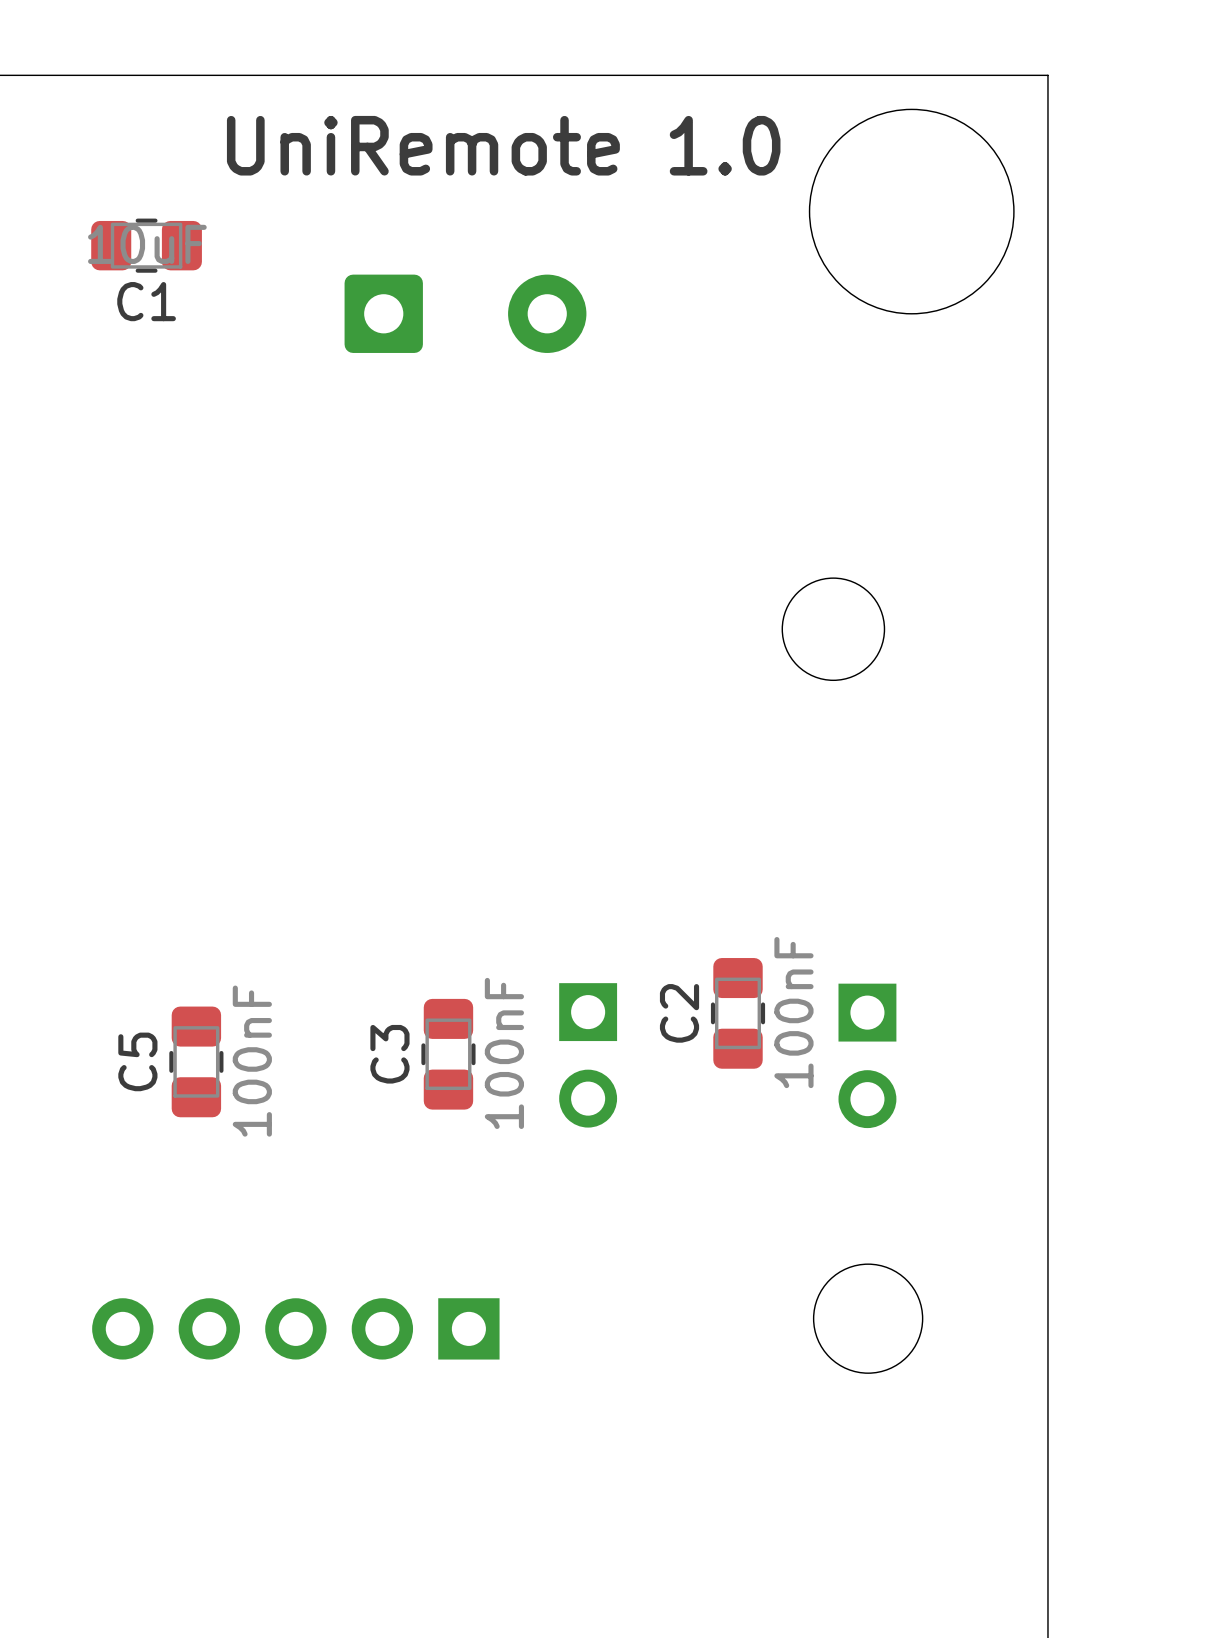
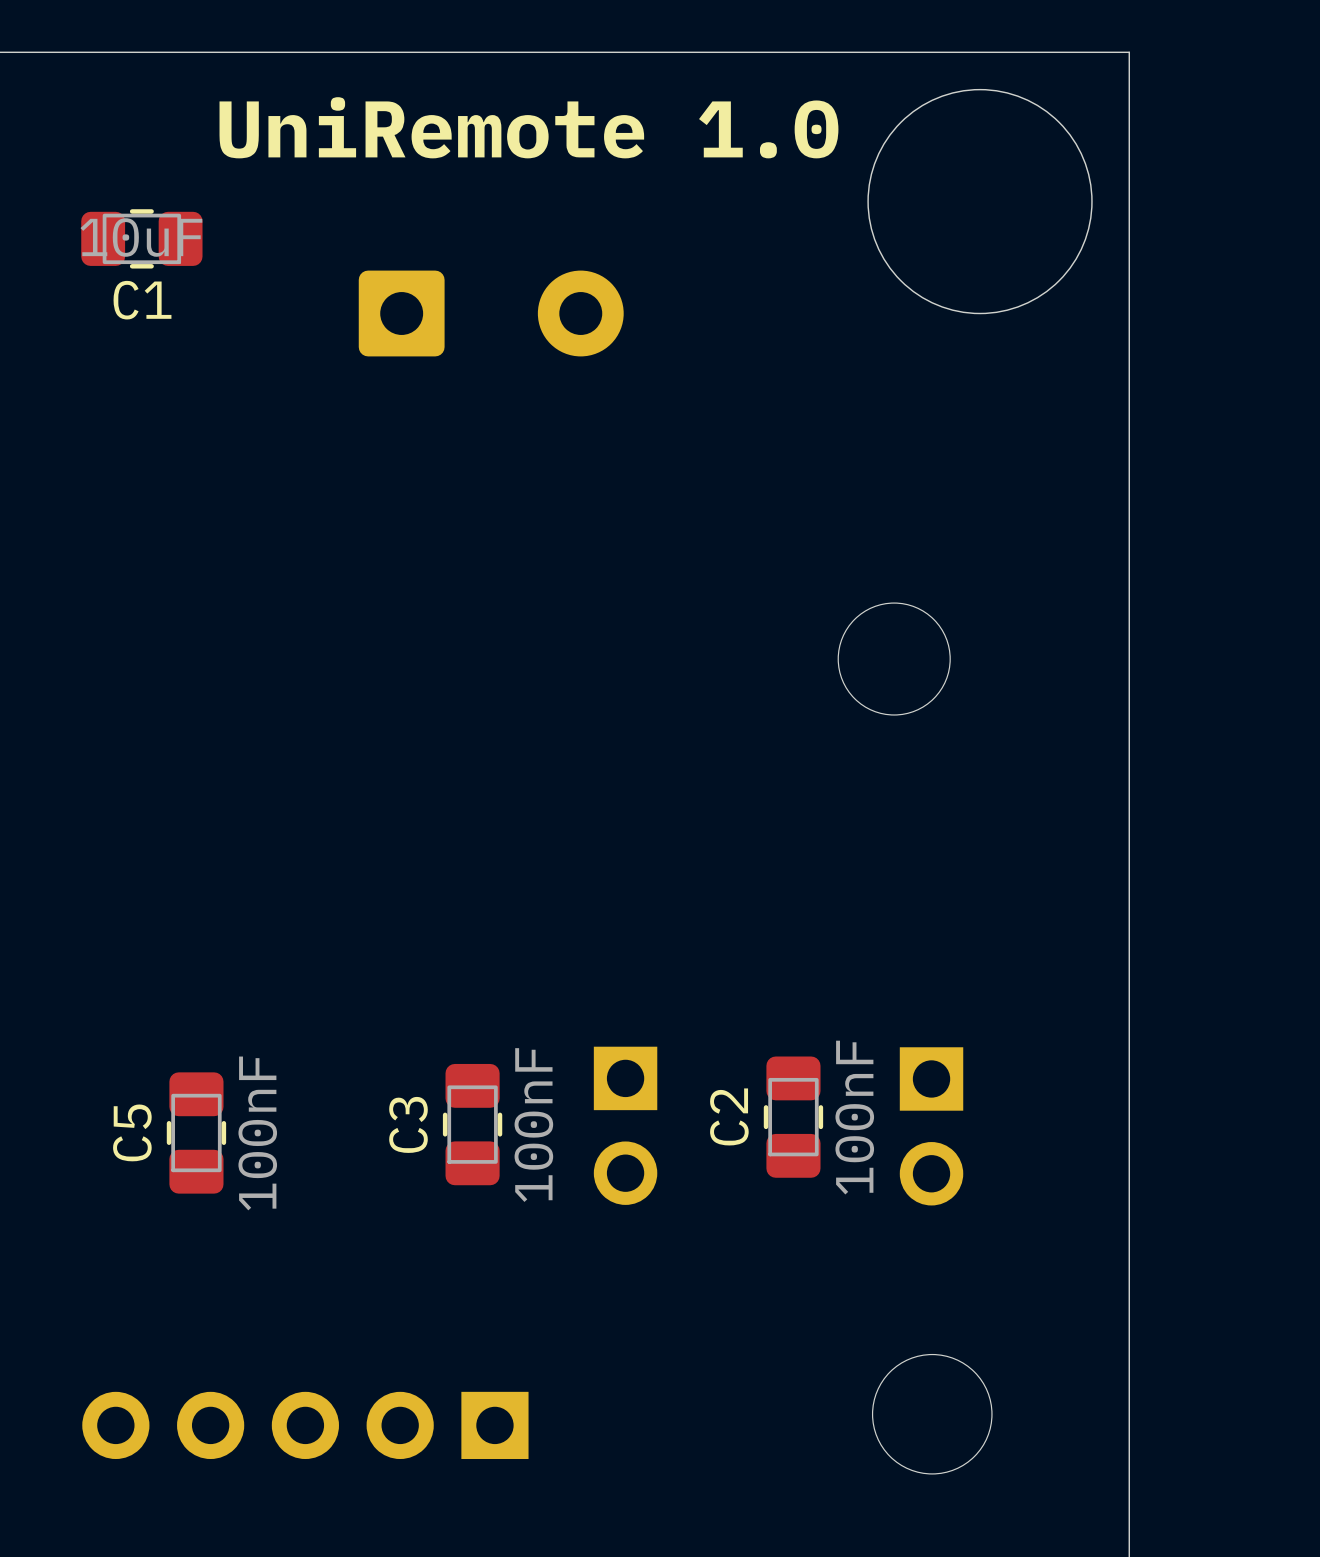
C2 position: (738, 1013) -> (793, 1117)

